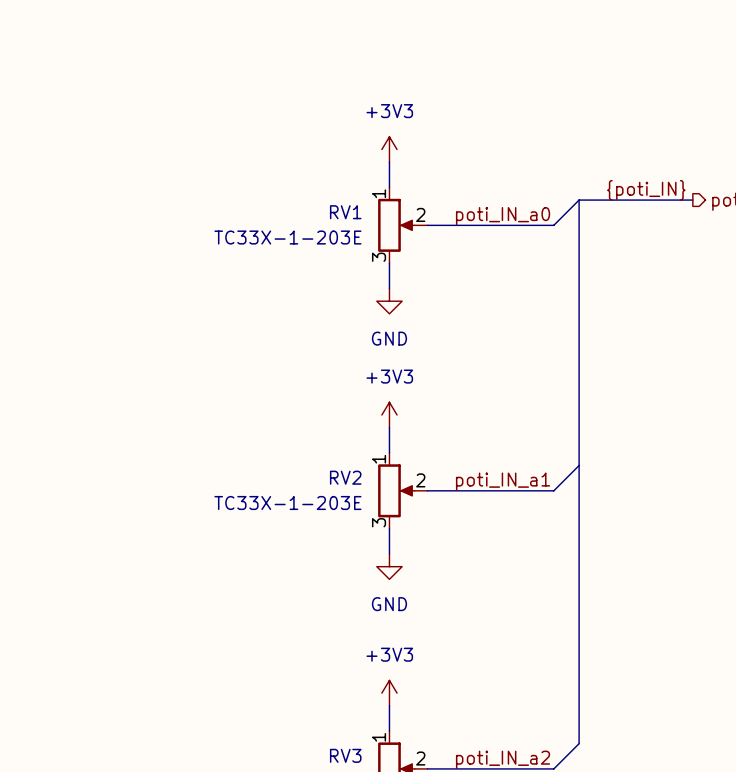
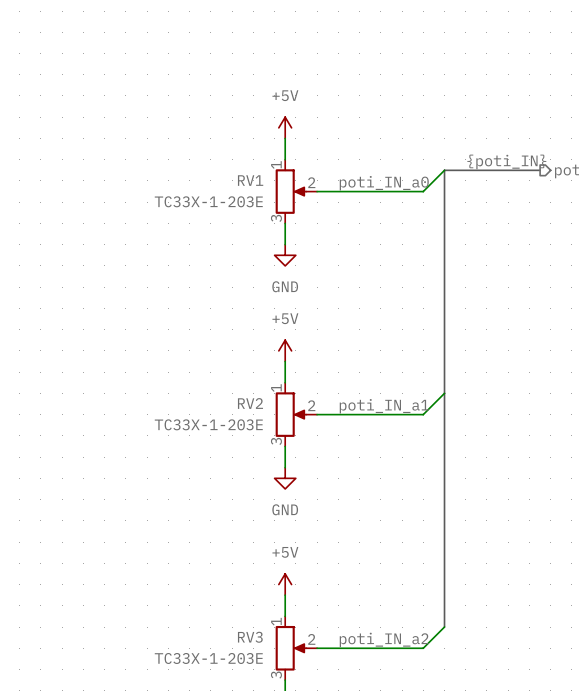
power symbol: +3V3 (389, 149) -> +5V (285, 127)
power symbol: +3V3 (389, 414) -> +5V (285, 350)
power symbol: +3V3 (389, 693) -> +5V (285, 584)

